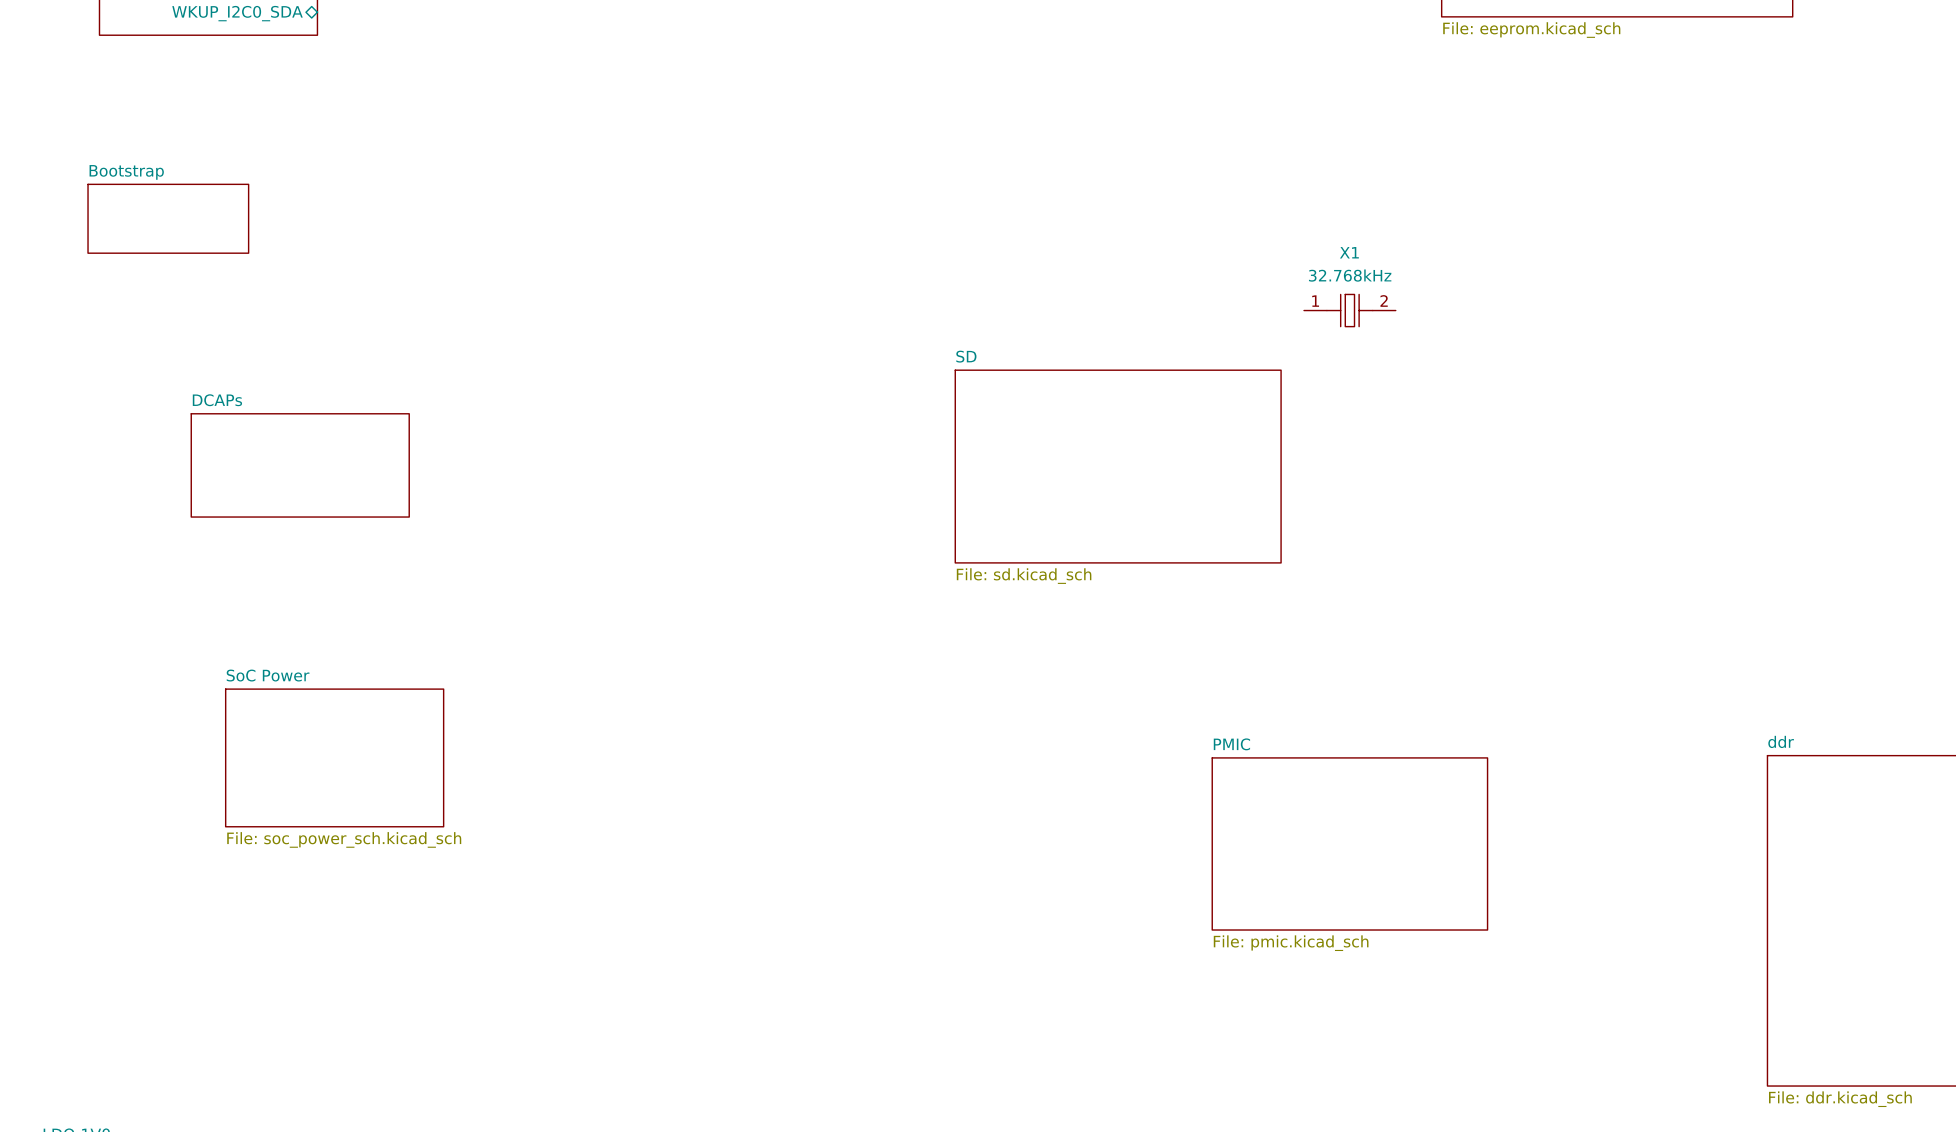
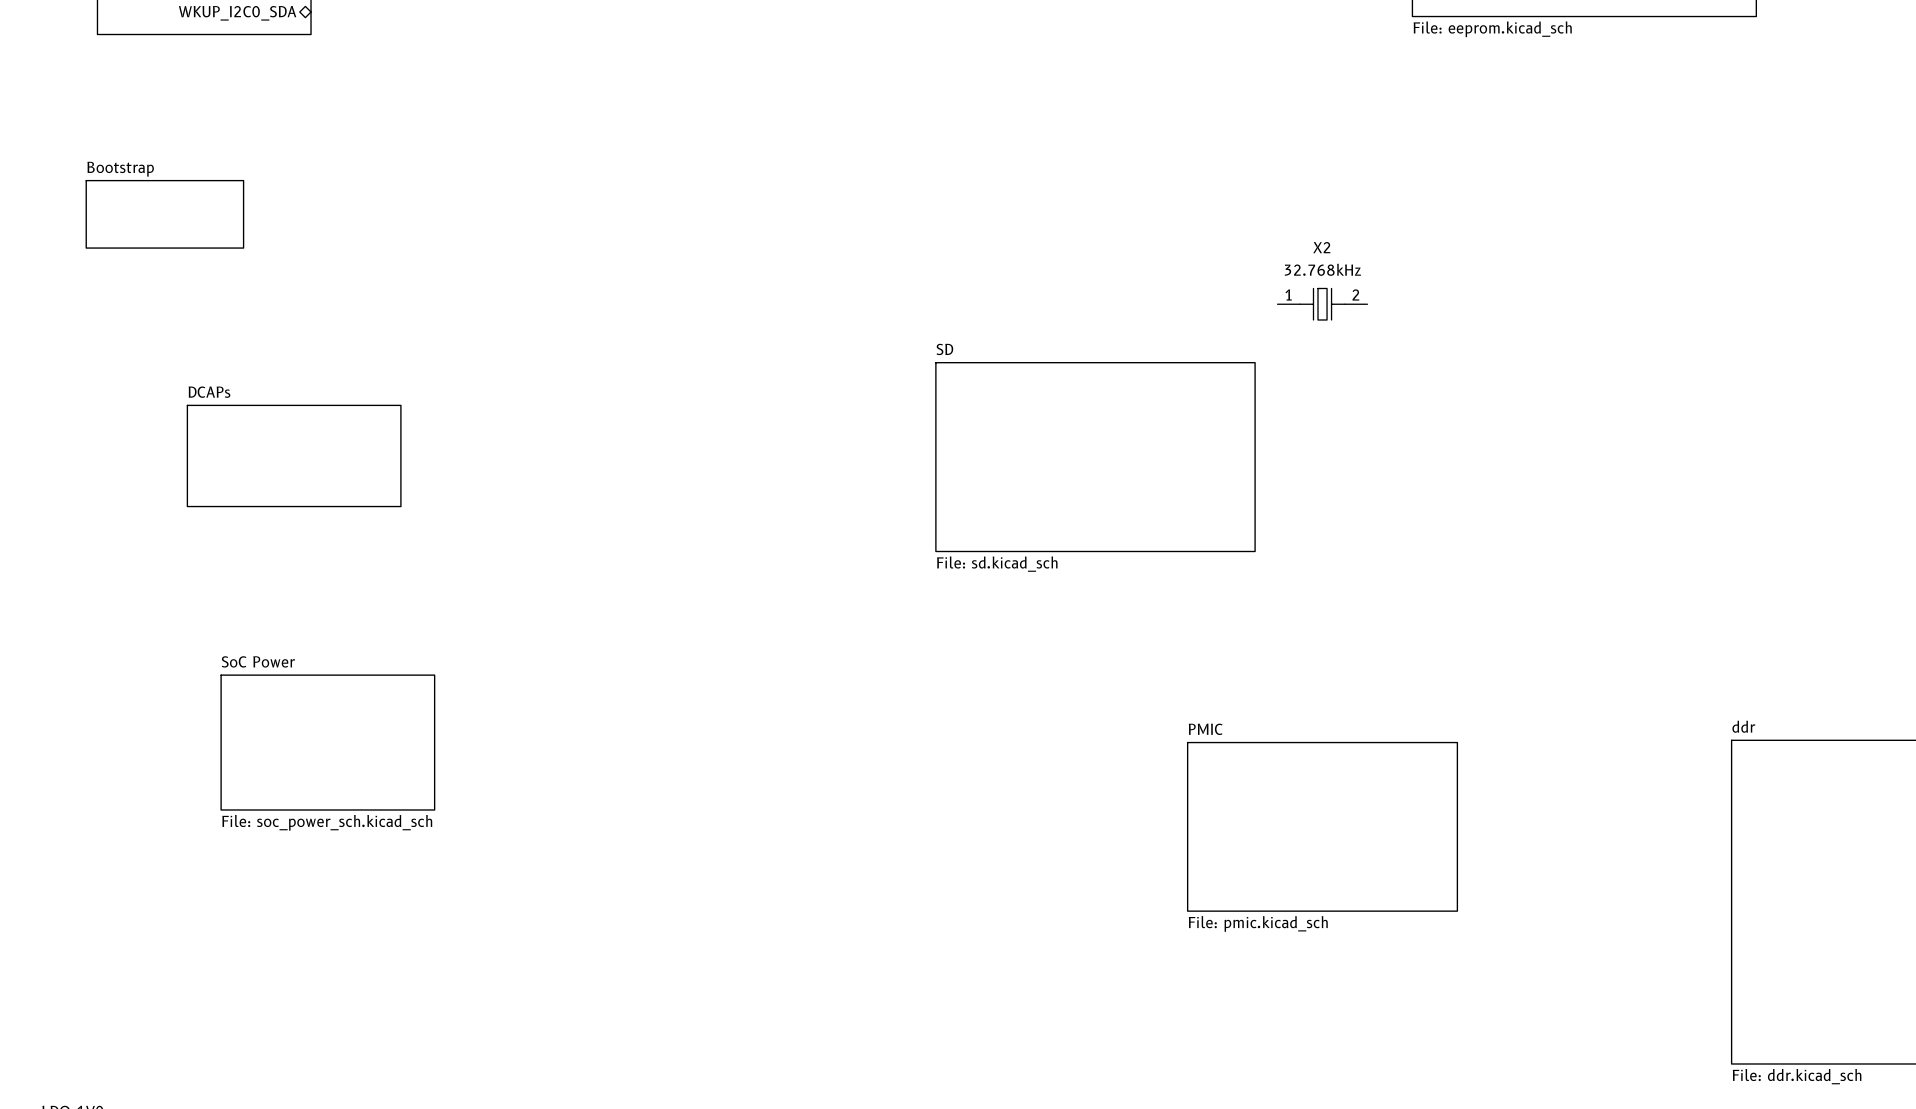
X1 name: X1 (1349, 252) -> X2 (1321, 247)

